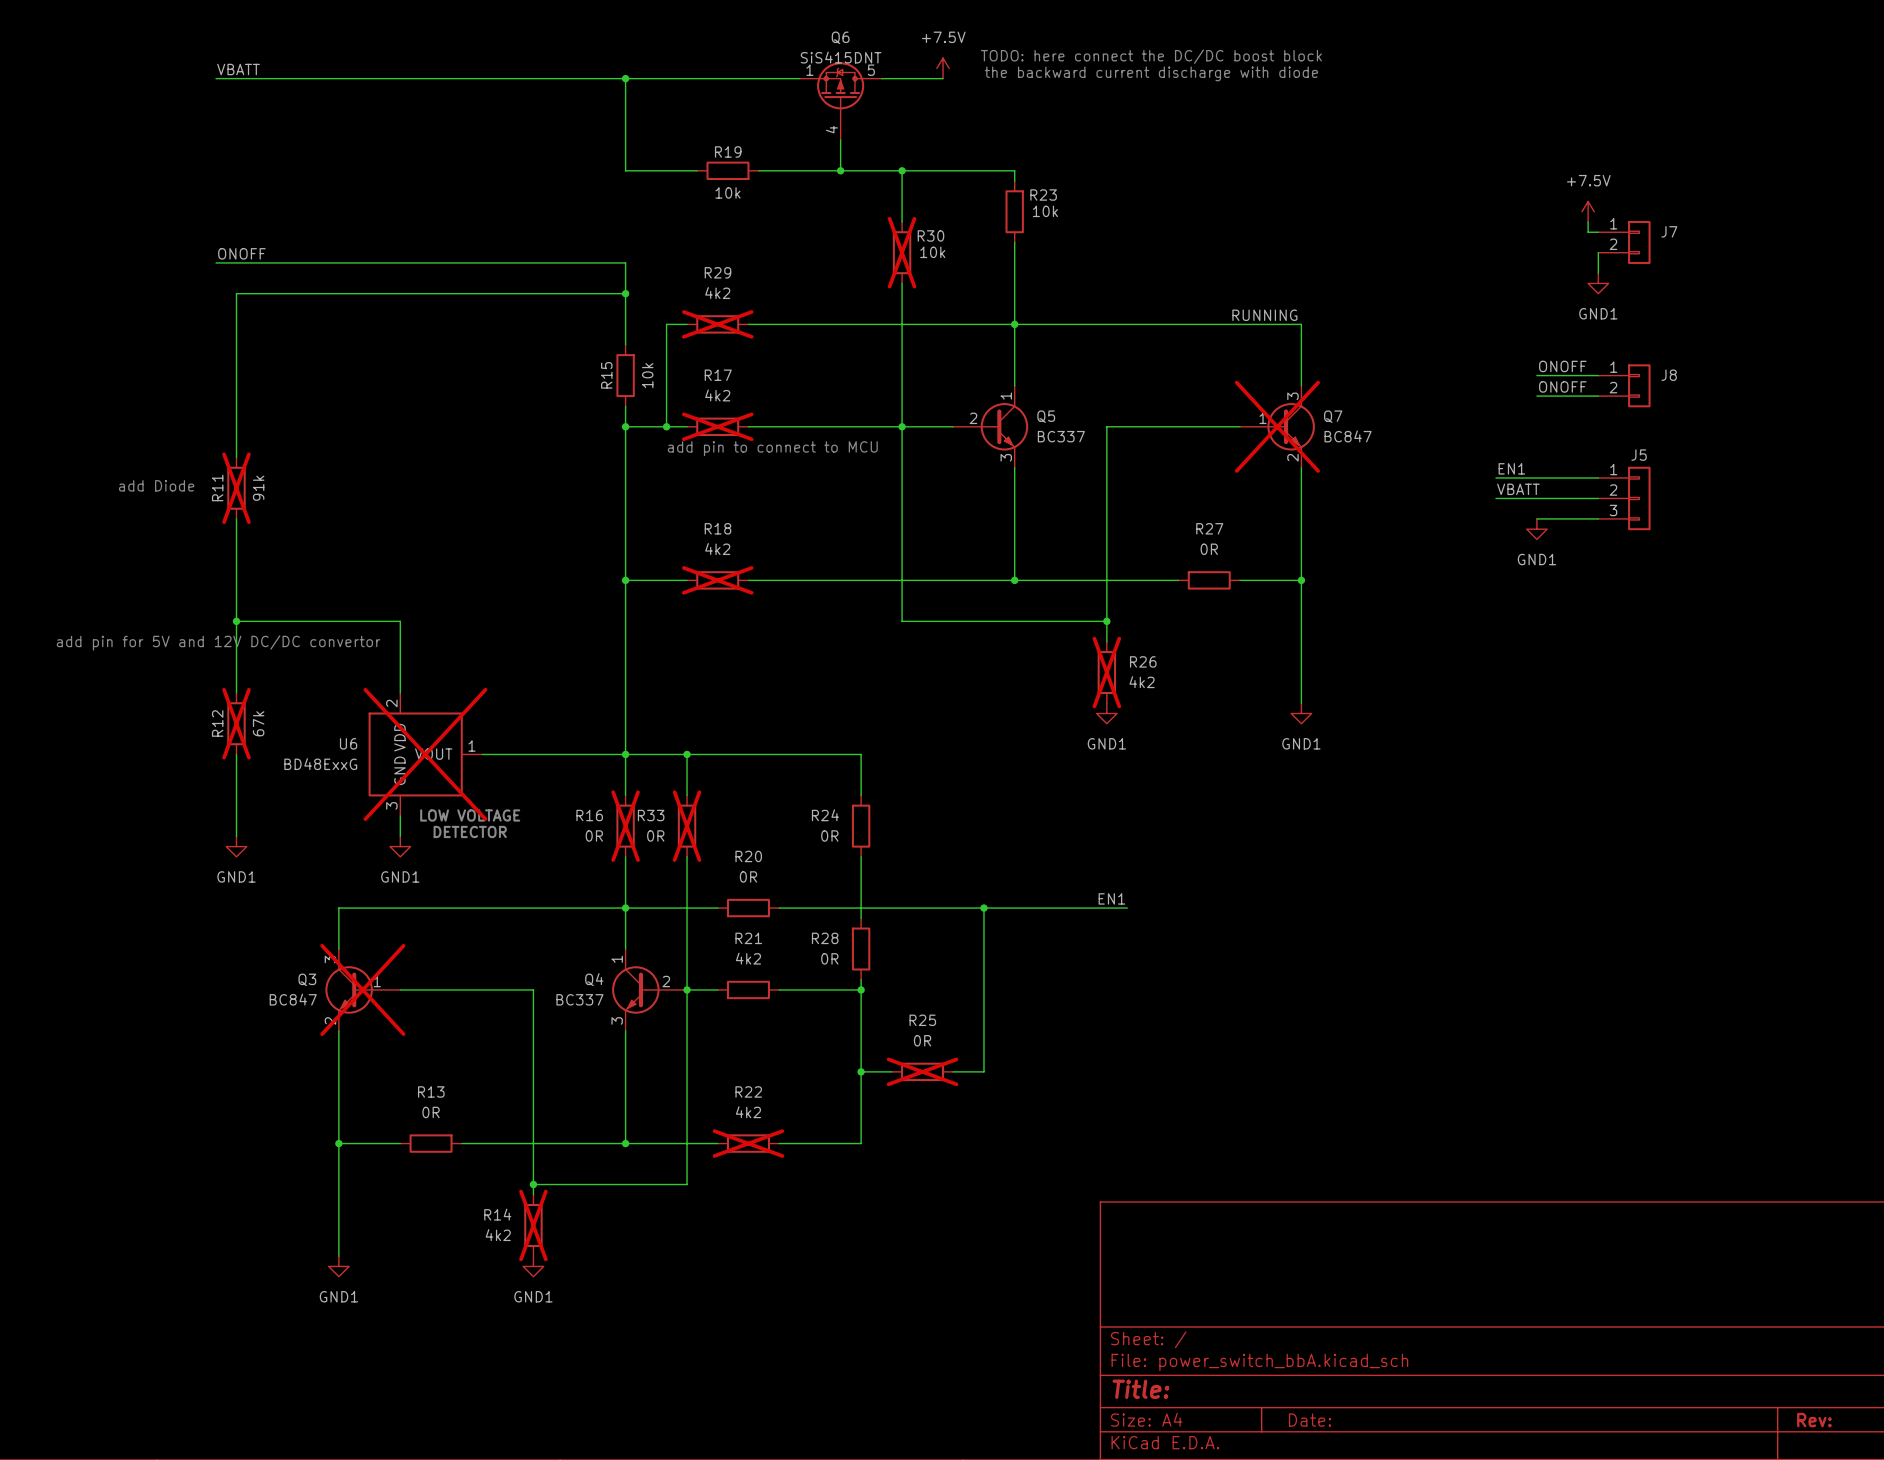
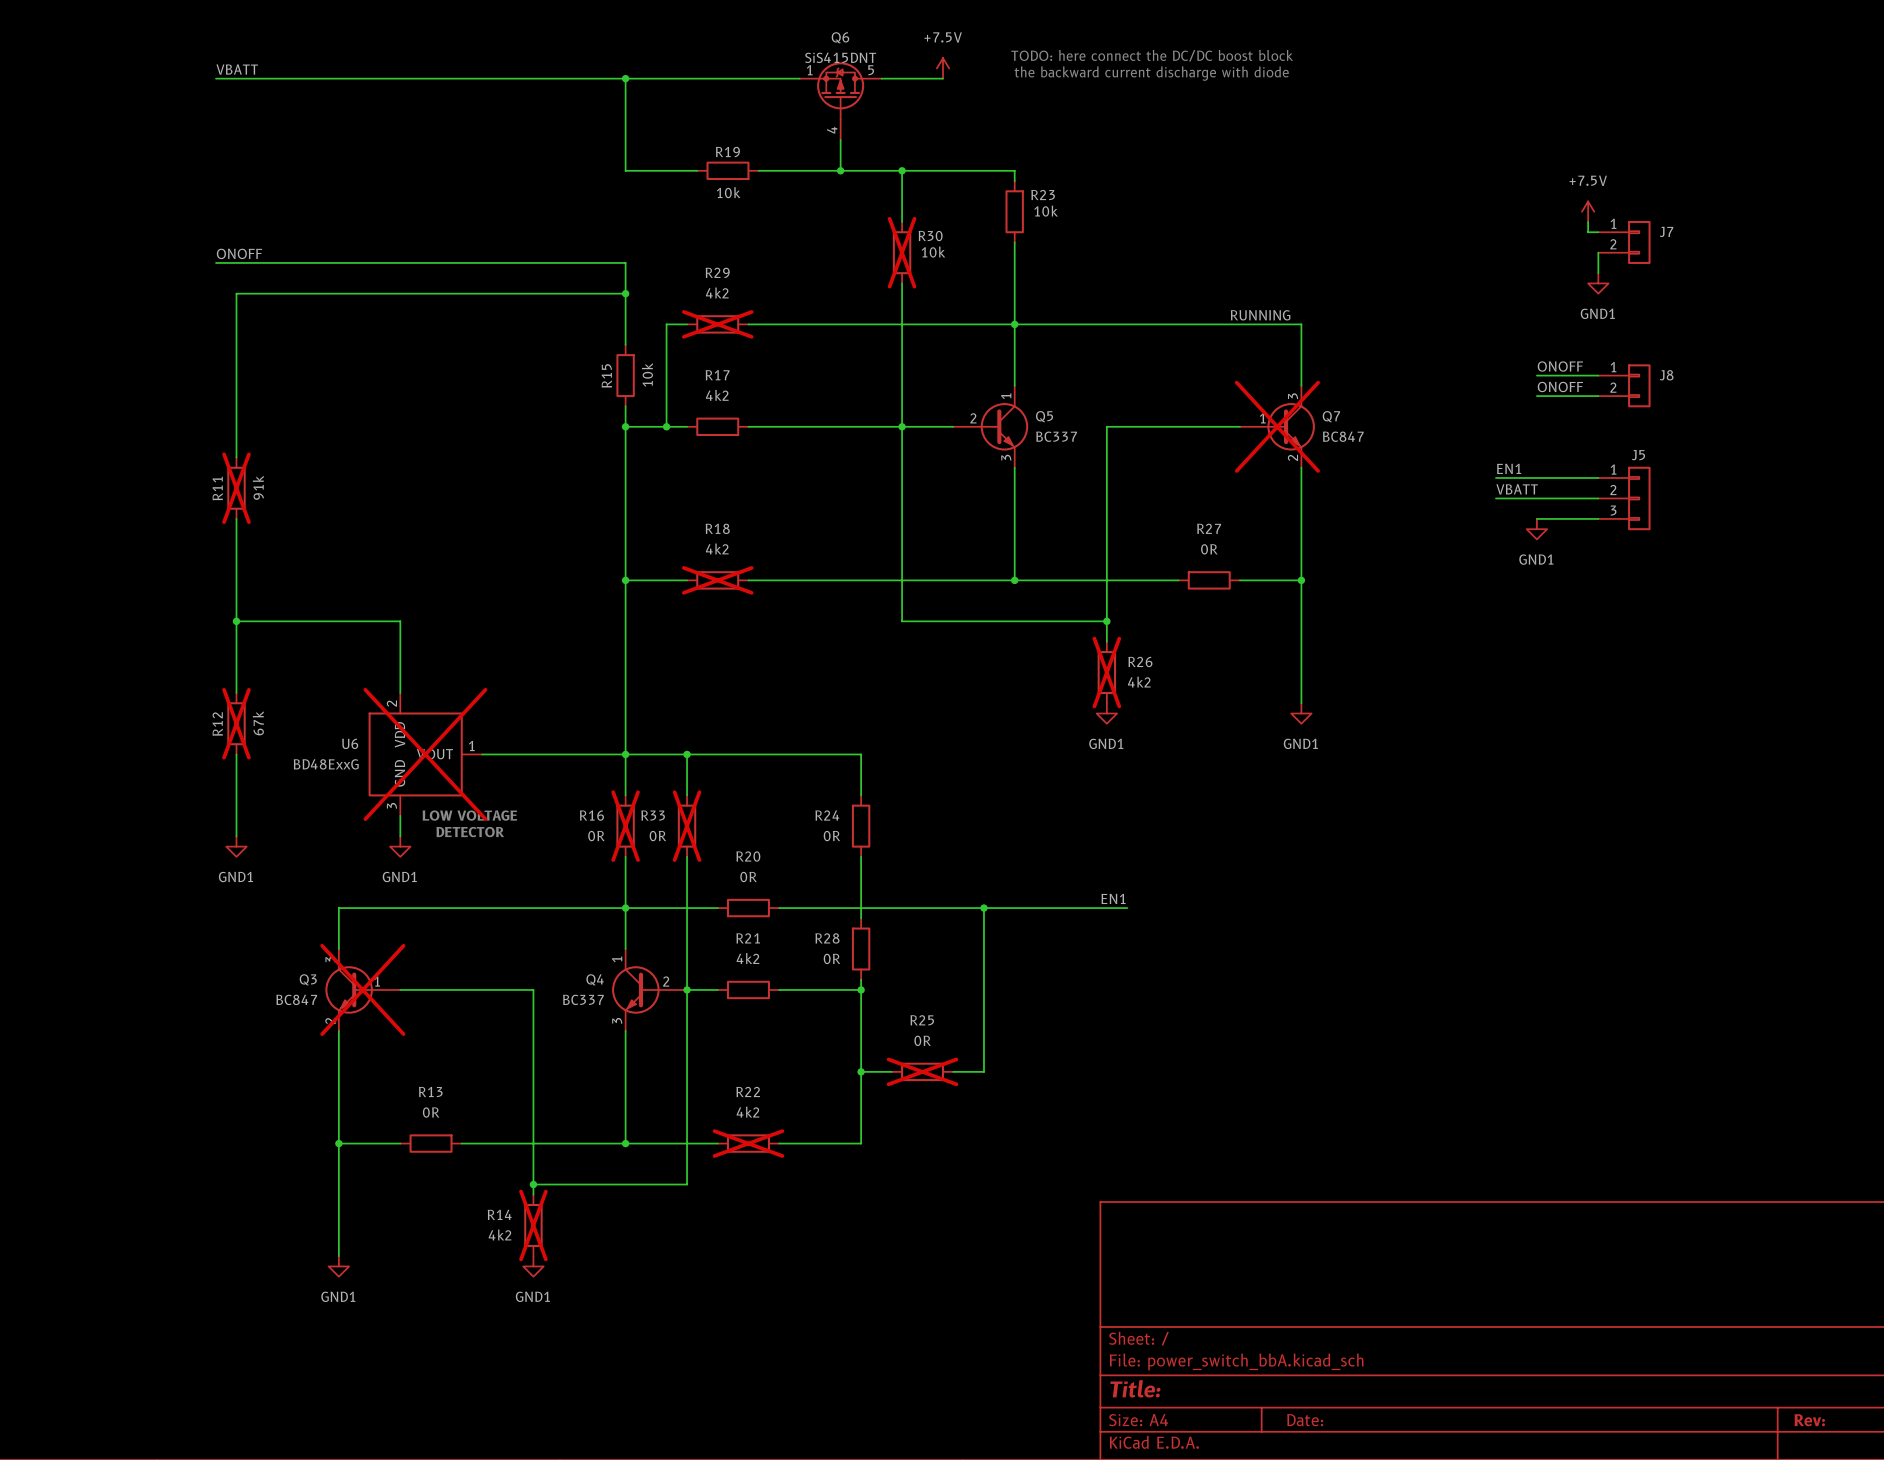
R17 do-not-place cross: (717, 426) -> none
text: add pin to connect to MCU (772, 448) -> none
text: add Diode (156, 485) -> none
text: add pin for 5V and 12V DC/DC convertor (218, 642) -> none

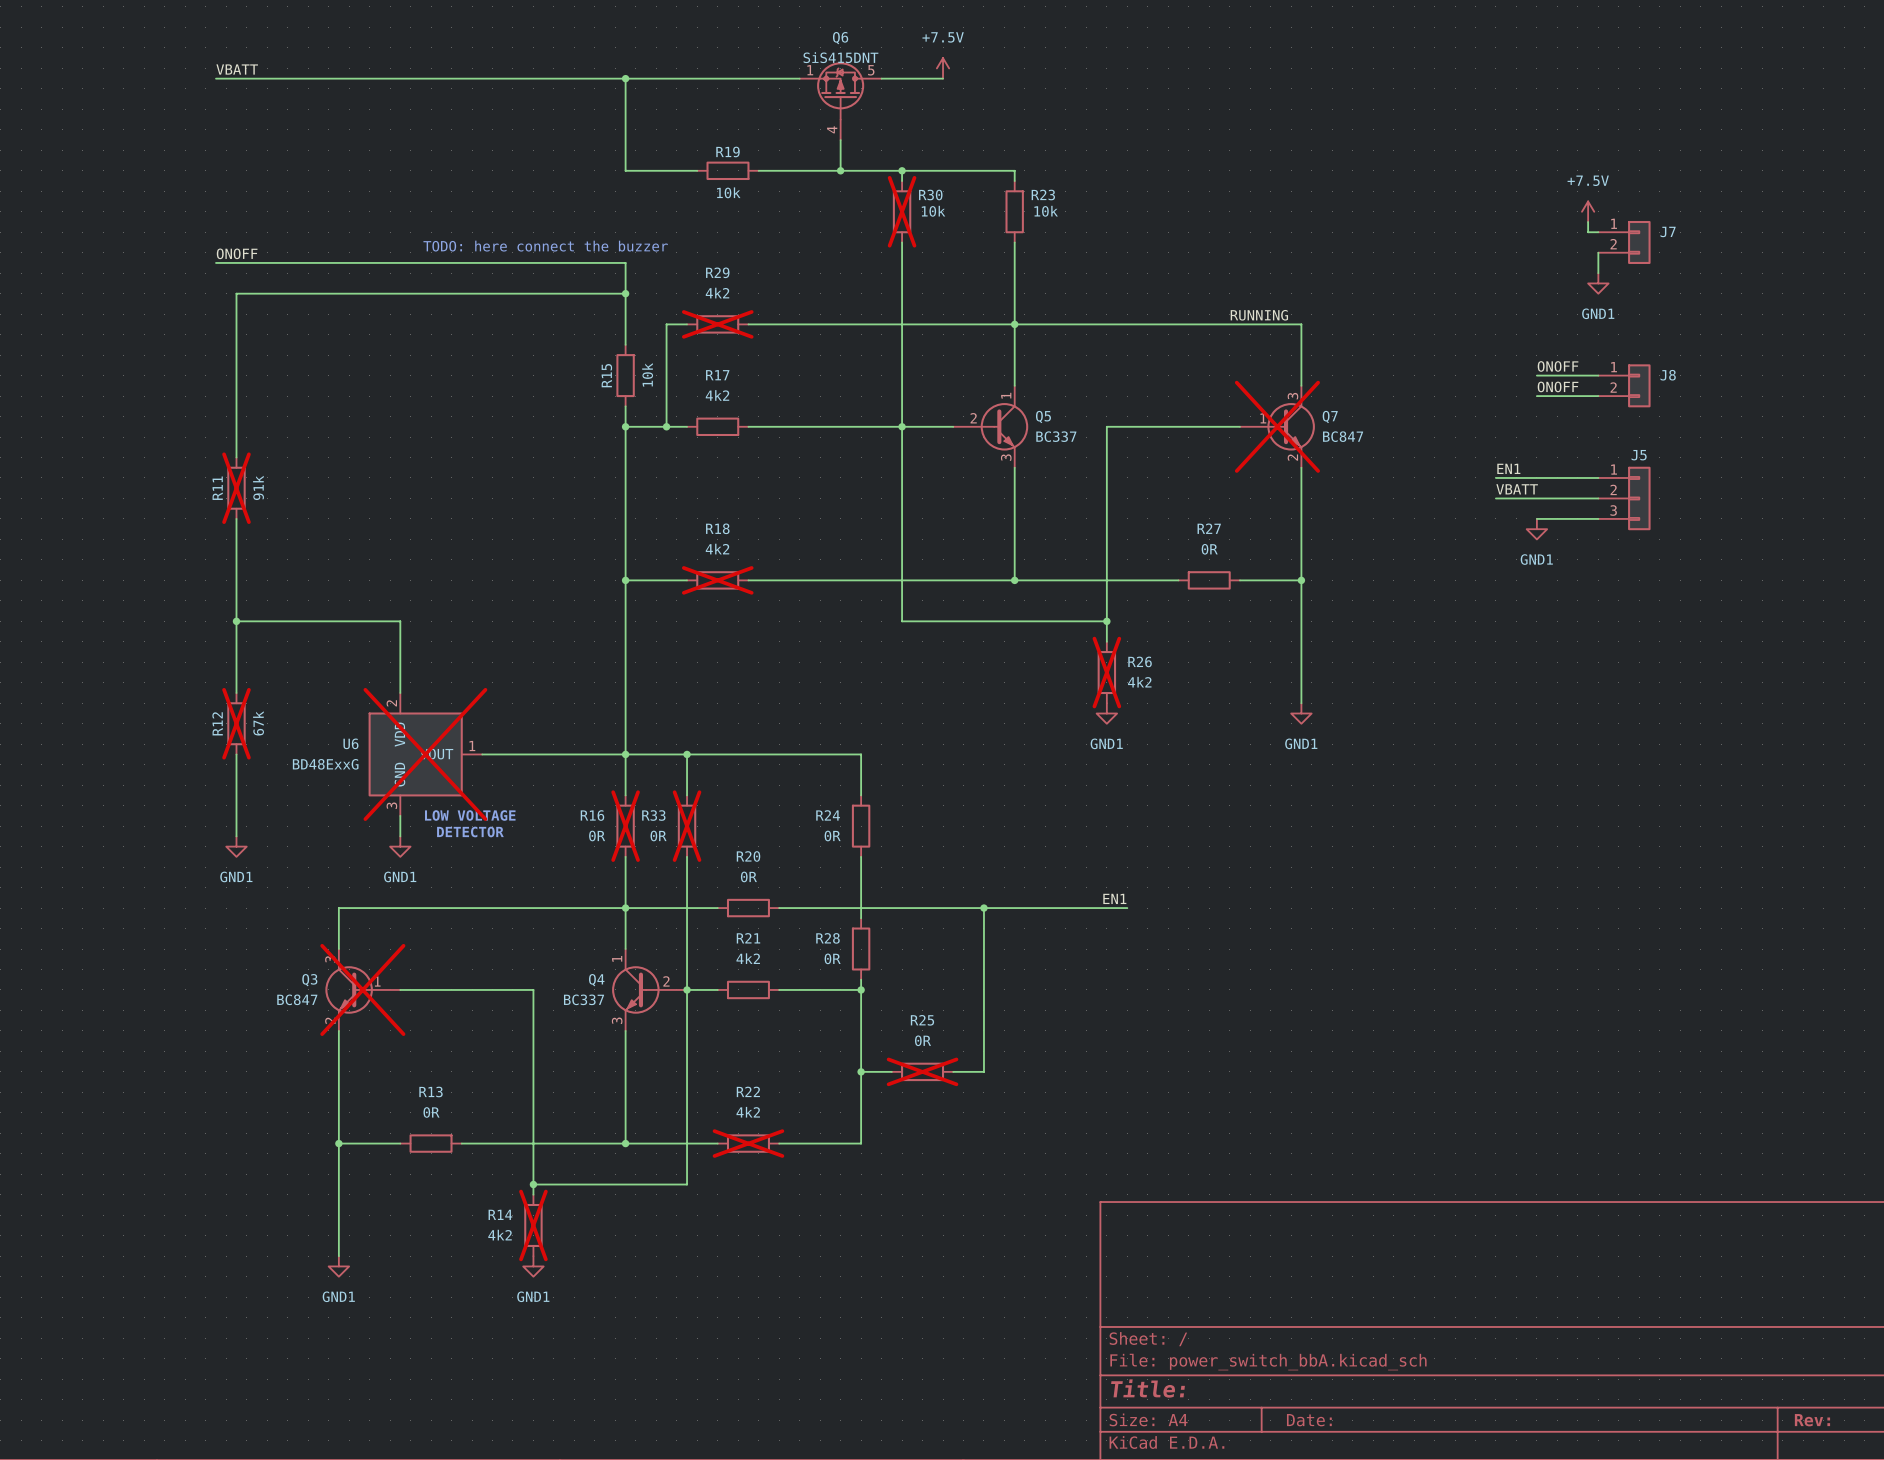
text: TODO: here connect the DC/DC boost block (1152, 55) -> none
text: the backward current discharge with diode (1151, 73) -> none
text: none -> TODO: here connect the buzzer (545, 246)
R30 position: (902, 252) -> (902, 211)

